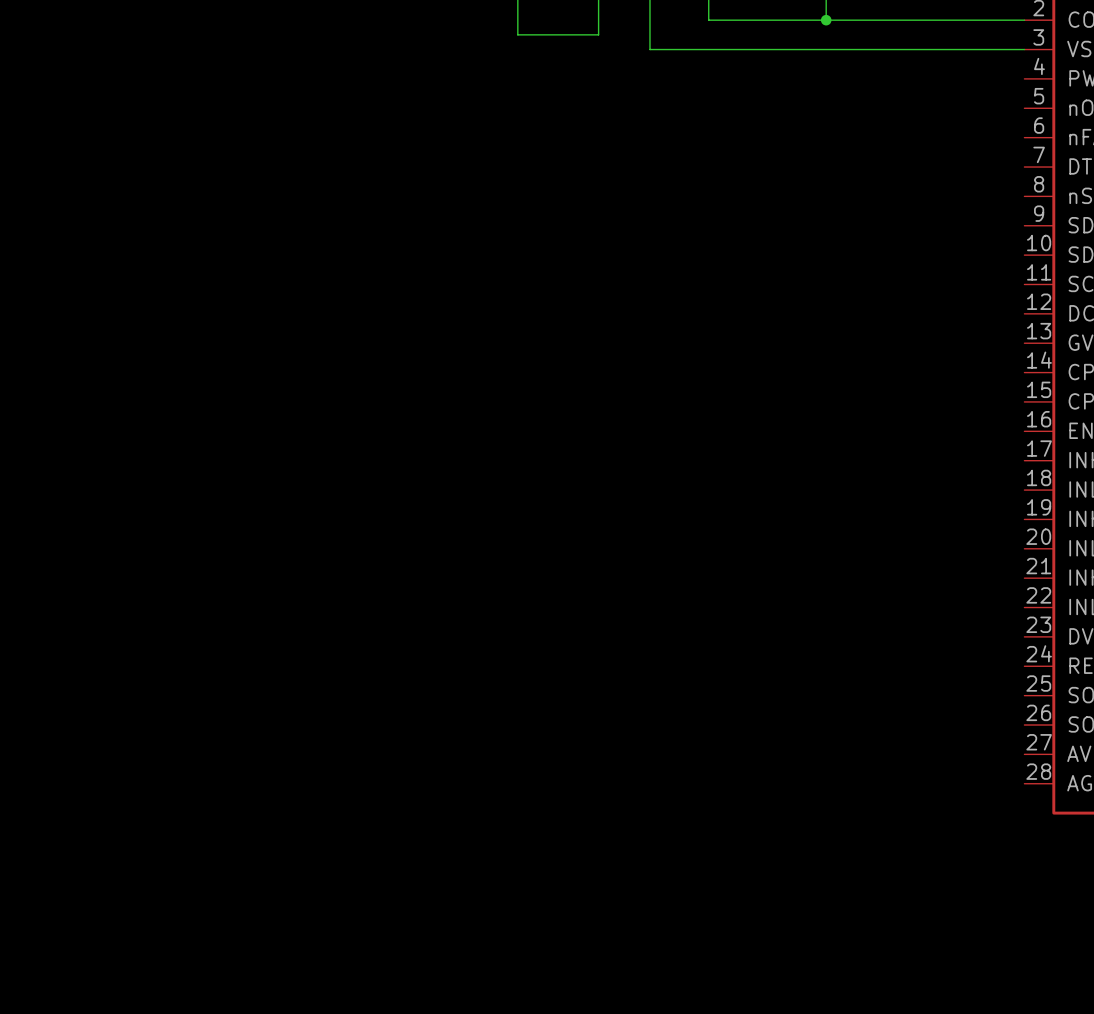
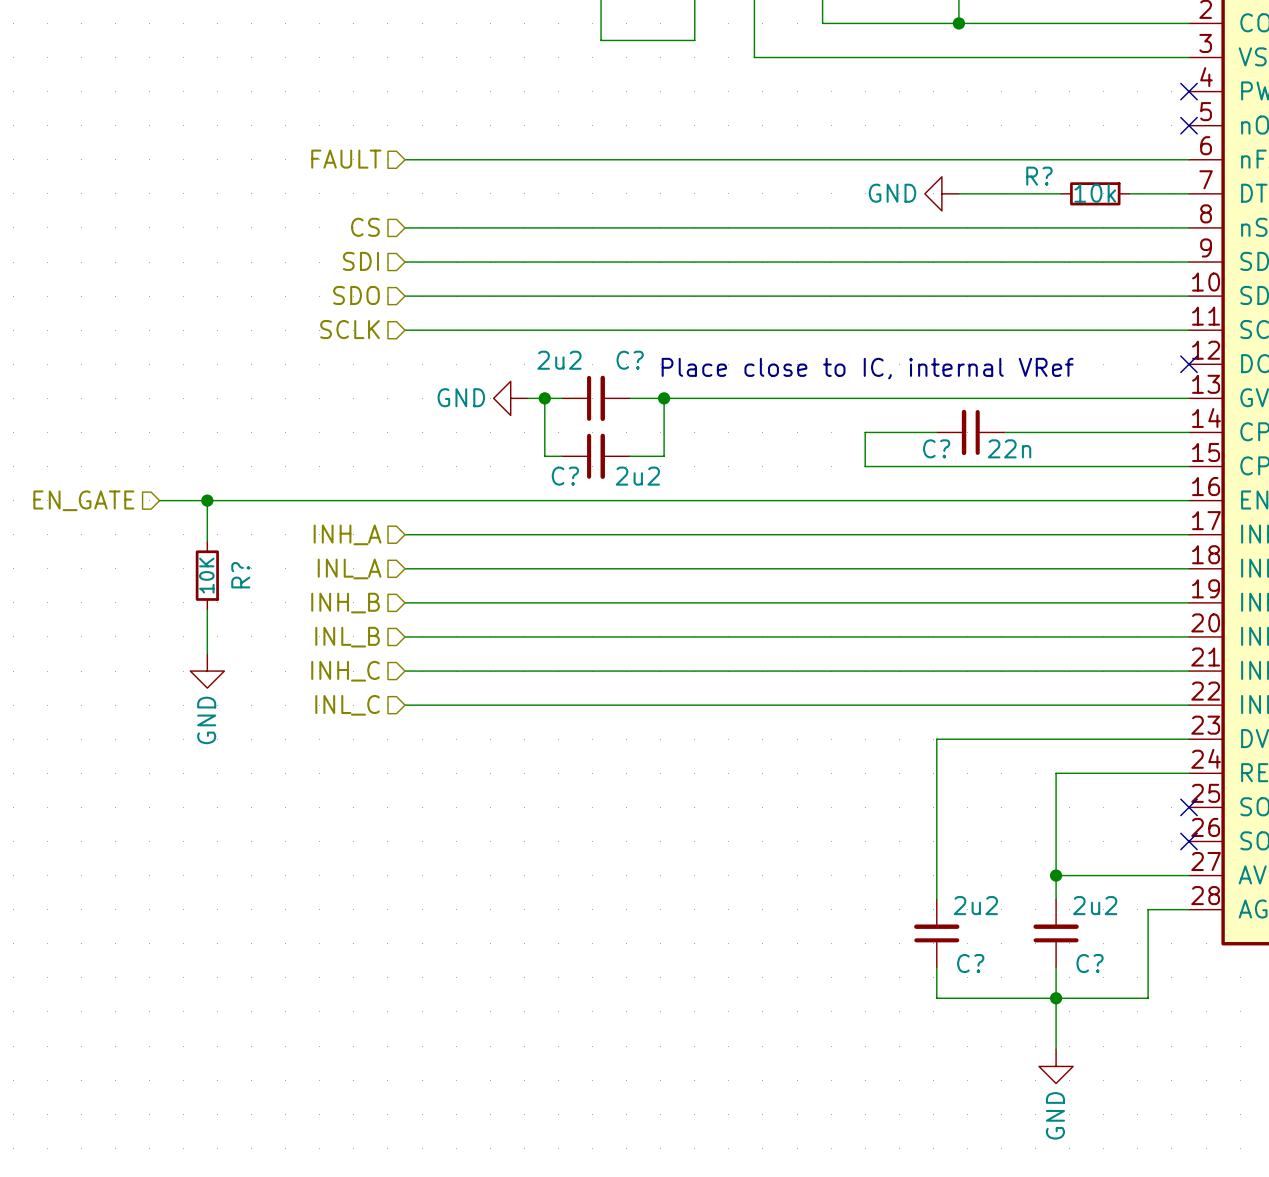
no-connect mark: none -> (1189, 91)
no-connect mark: none -> (1189, 125)
hierarchical label: none -> FAULT (346, 159)
wire: none -> (405, 159) (1189, 159)
power symbol: none -> GND (941, 193)
wire: none -> (958, 193) (1061, 193)
R?: none -> 10k (1095, 193)
wire: none -> (1129, 193) (1189, 193)
hierarchical label: none -> CS (365, 227)
wire: none -> (405, 227) (1189, 227)
hierarchical label: none -> SDI (360, 261)
wire: none -> (405, 262) (1189, 262)
hierarchical label: none -> SDO (356, 295)
wire: none -> (405, 296) (1189, 296)
hierarchical label: none -> SCLK (349, 329)
wire: none -> (405, 330) (1189, 330)
no-connect mark: none -> (1189, 364)
text: none -> Place close to IC, internal VRef (867, 368)
power symbol: none -> GND (510, 398)
wire: none -> (527, 398) (561, 398)
wire: none -> (544, 398) (544, 456) (561, 456)
junction: none -> (544, 398)
C?: none -> 2u2 (595, 398)
wire: none -> (630, 398) (1189, 398)
wire: none -> (664, 398) (664, 456) (630, 456)
junction: none -> (664, 398)
wire: none -> (936, 432) (865, 432) (865, 466) (1189, 466)
C?: none -> 22n (970, 432)
wire: none -> (1004, 432) (1189, 432)
C?: none -> 2u2 (595, 456)
hierarchical label: none -> EN_GATE (83, 500)
wire: none -> (159, 500) (1189, 500)
wire: none -> (207, 500) (207, 541)
junction: none -> (207, 500)
hierarchical label: none -> INH_A (347, 534)
wire: none -> (405, 534) (1189, 534)
hierarchical label: none -> INL_A (349, 568)
wire: none -> (405, 568) (1189, 568)
R?: none -> 10K (207, 575)
hierarchical label: none -> INH_B (345, 603)
wire: none -> (405, 602) (1189, 602)
wire: none -> (207, 609) (207, 654)
hierarchical label: none -> INL_B (347, 637)
wire: none -> (405, 636) (1189, 636)
power symbol: none -> GND (207, 671)
hierarchical label: none -> INH_C (345, 671)
wire: none -> (405, 671) (1189, 671)
hierarchical label: none -> INL_C (347, 705)
wire: none -> (405, 705) (1189, 705)
wire: none -> (1189, 739) (936, 739) (936, 899)
wire: none -> (1189, 773) (1056, 773) (1056, 899)
no-connect mark: none -> (1189, 807)
no-connect mark: none -> (1189, 841)
wire: none -> (1056, 875) (1189, 875)
junction: none -> (1056, 875)
wire: none -> (1189, 909) (1148, 909) (1148, 998) (936, 998) (936, 967)
C?: none -> 2u2 (936, 933)
C?: none -> 2u2 (1056, 933)
wire: none -> (1056, 967) (1056, 1049)
junction: none -> (1056, 998)
power symbol: none -> GND (1056, 1066)

